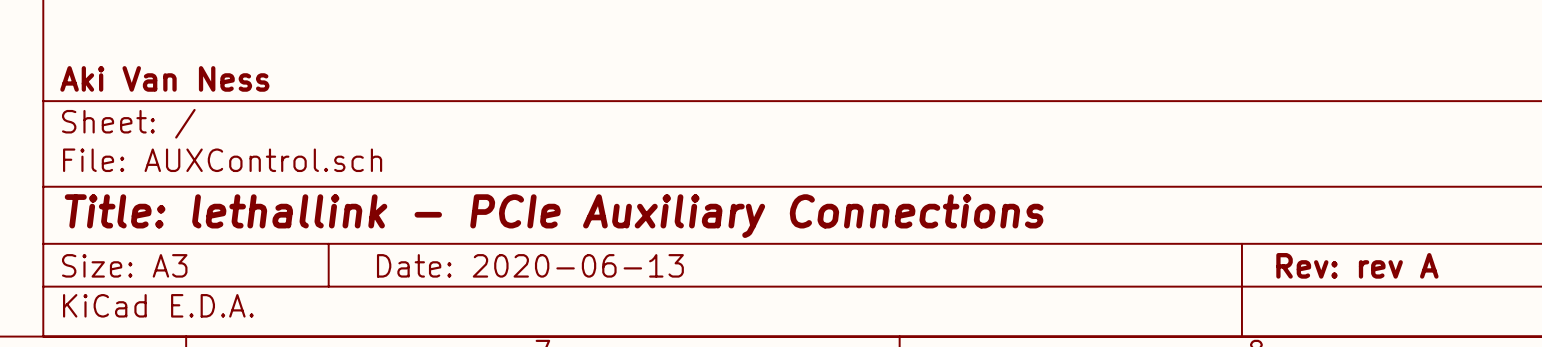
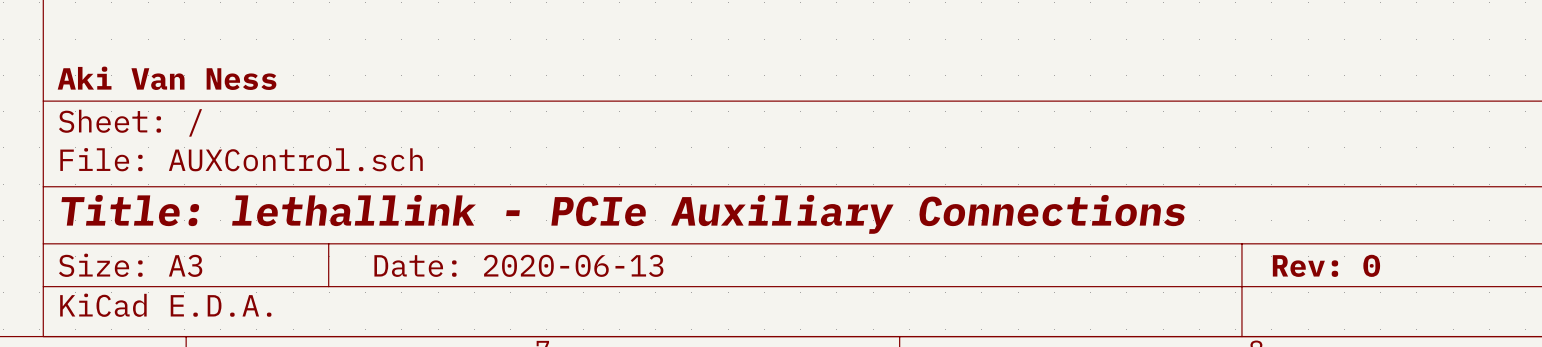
title block: Rev: rev A (1357, 265) -> Rev: 0 (1326, 265)

